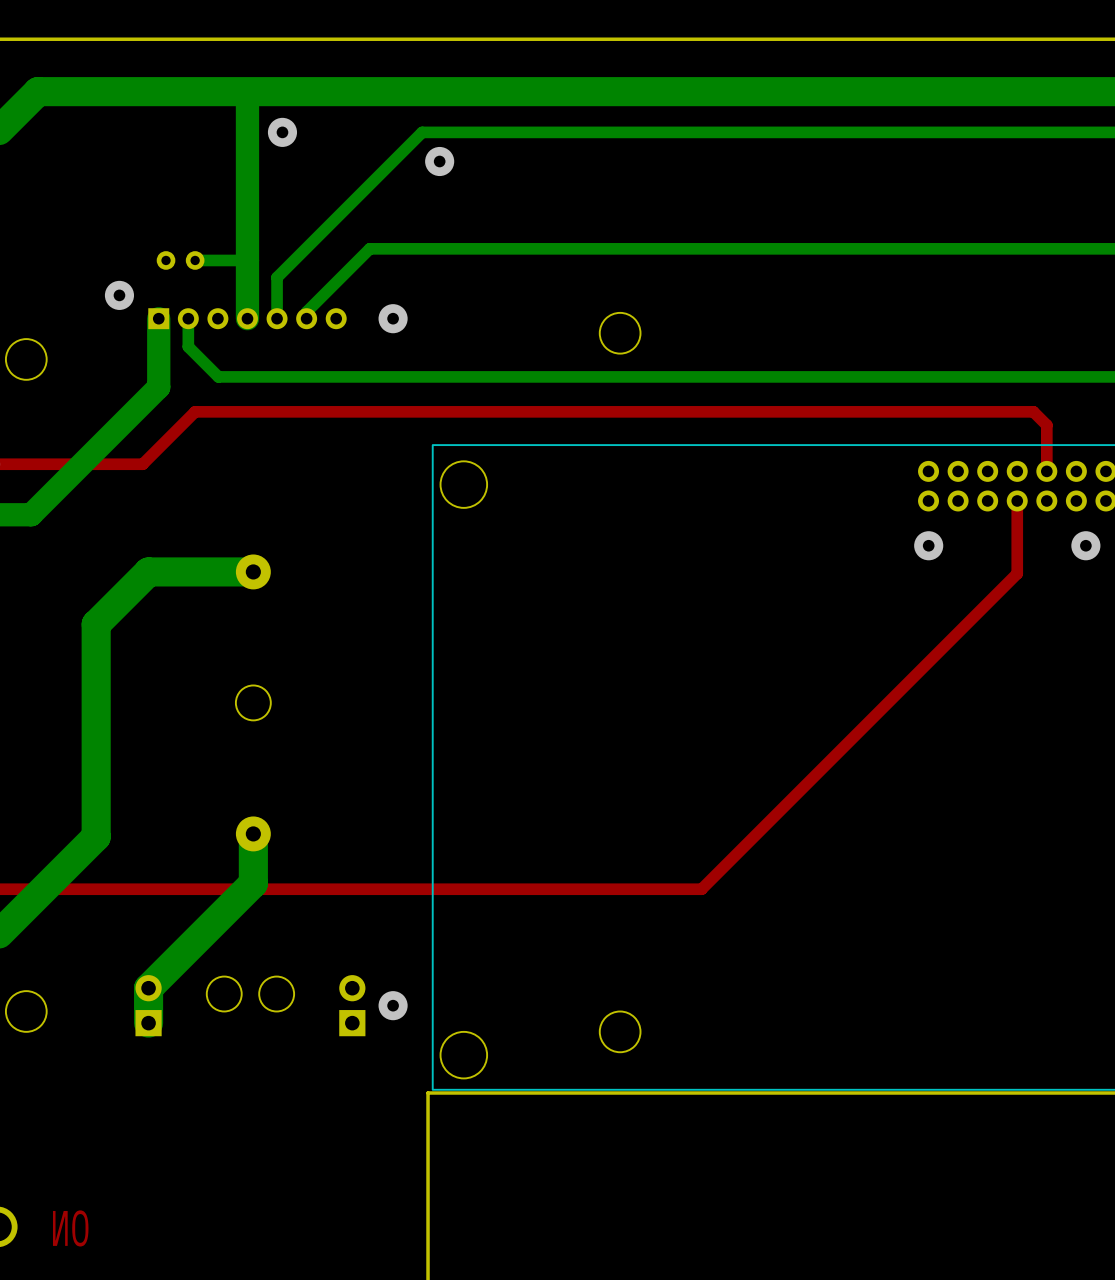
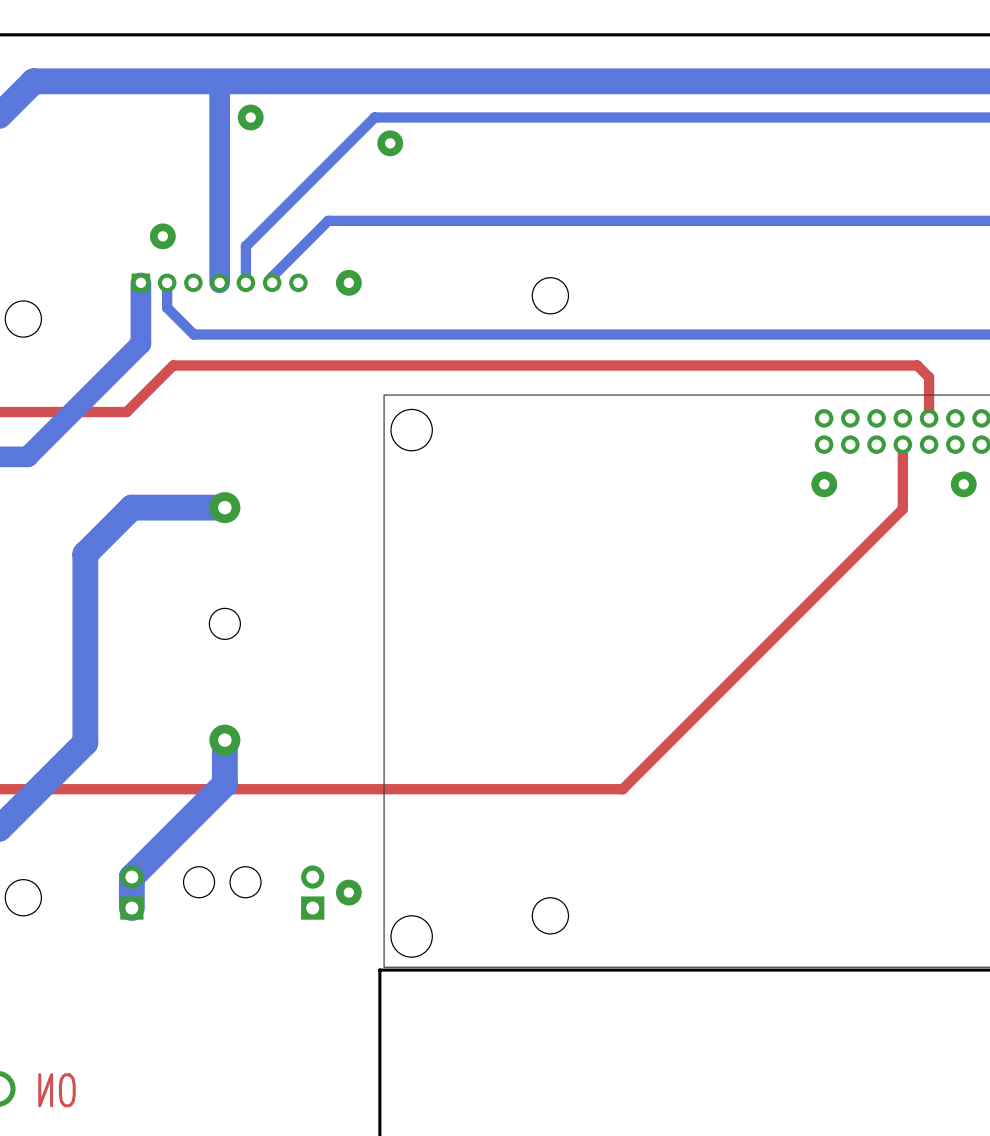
part: (180, 260) -> none
bottom track: (247, 260) (195, 260) -> none
via: none -> (162, 236)
via: (119, 295) -> none

